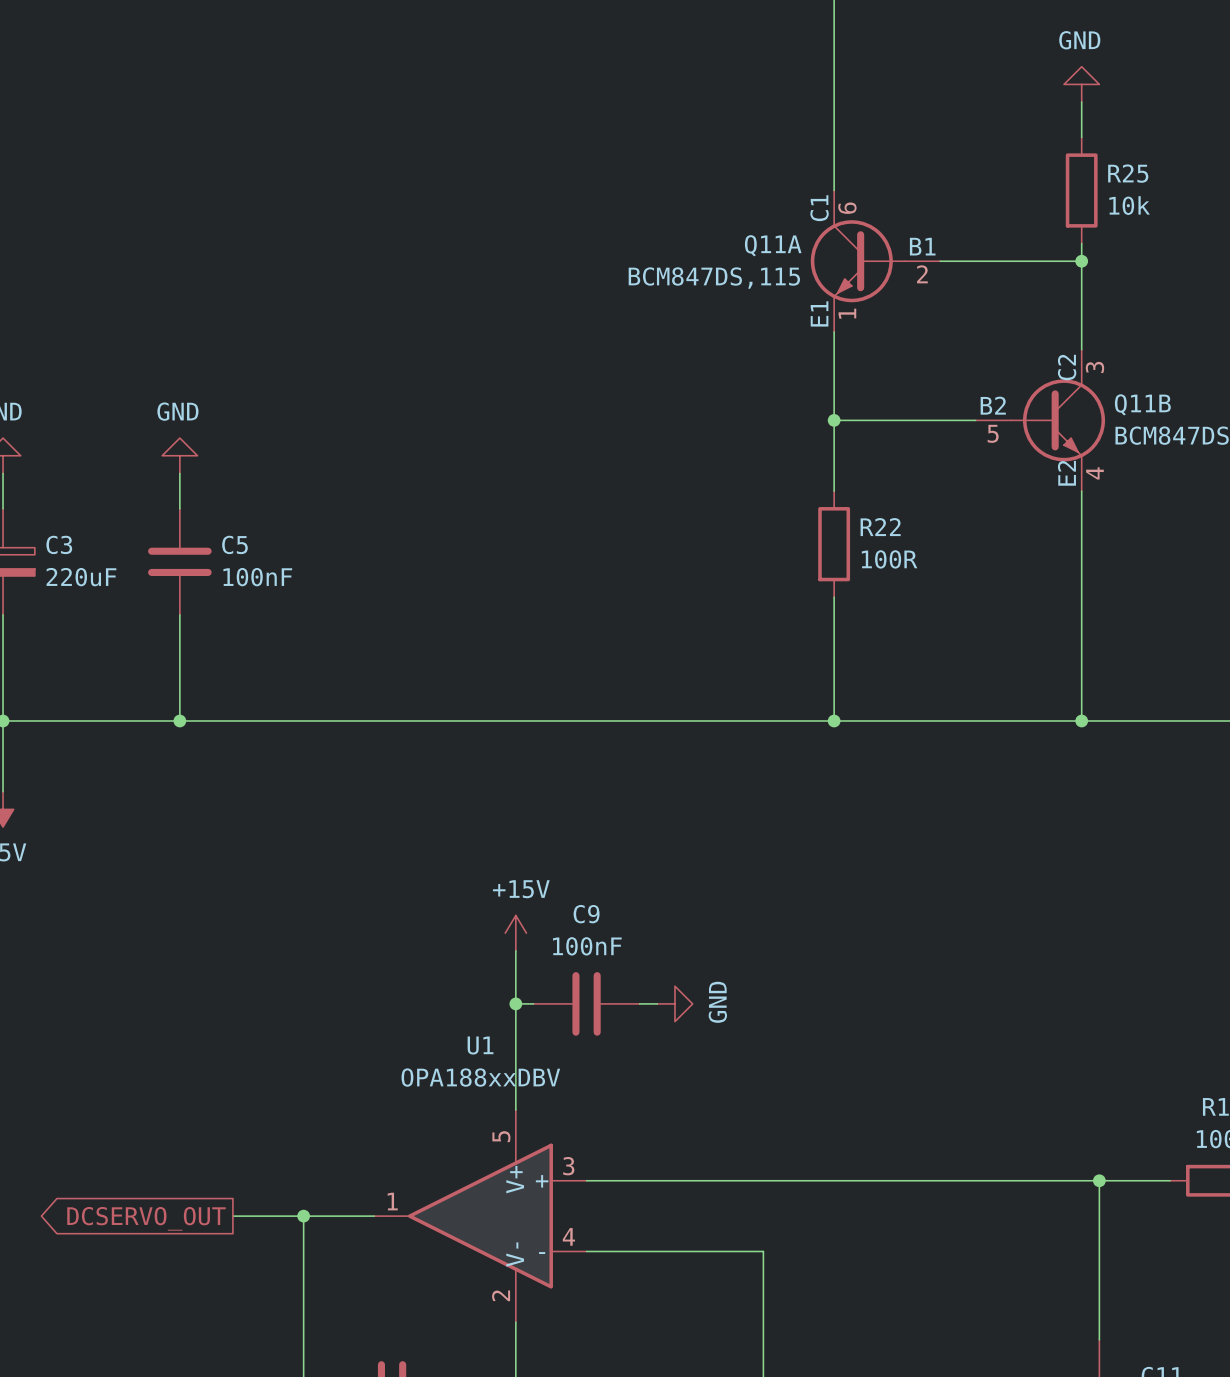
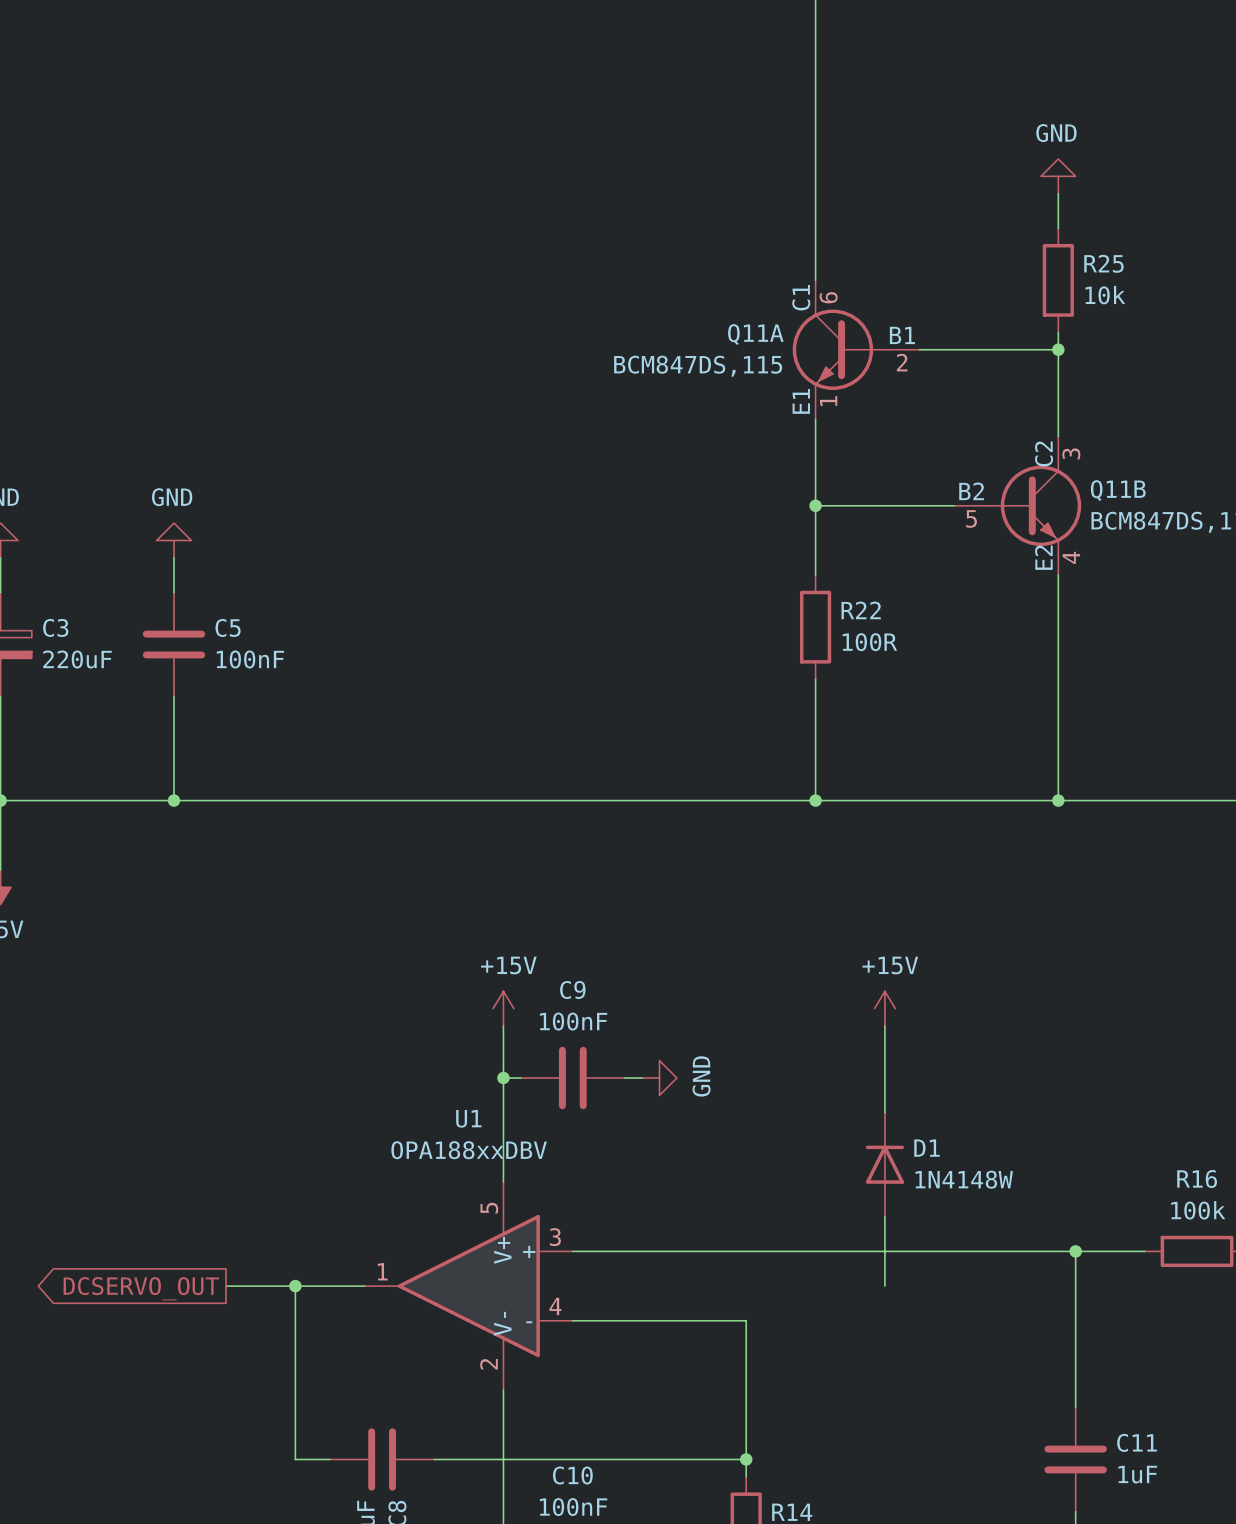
power symbol: none -> +15V (884, 1008)
wire: none -> (884, 1026) (884, 1112)
D1: none -> 1N4148W (884, 1164)
wire: none -> (884, 1216) (884, 1286)

